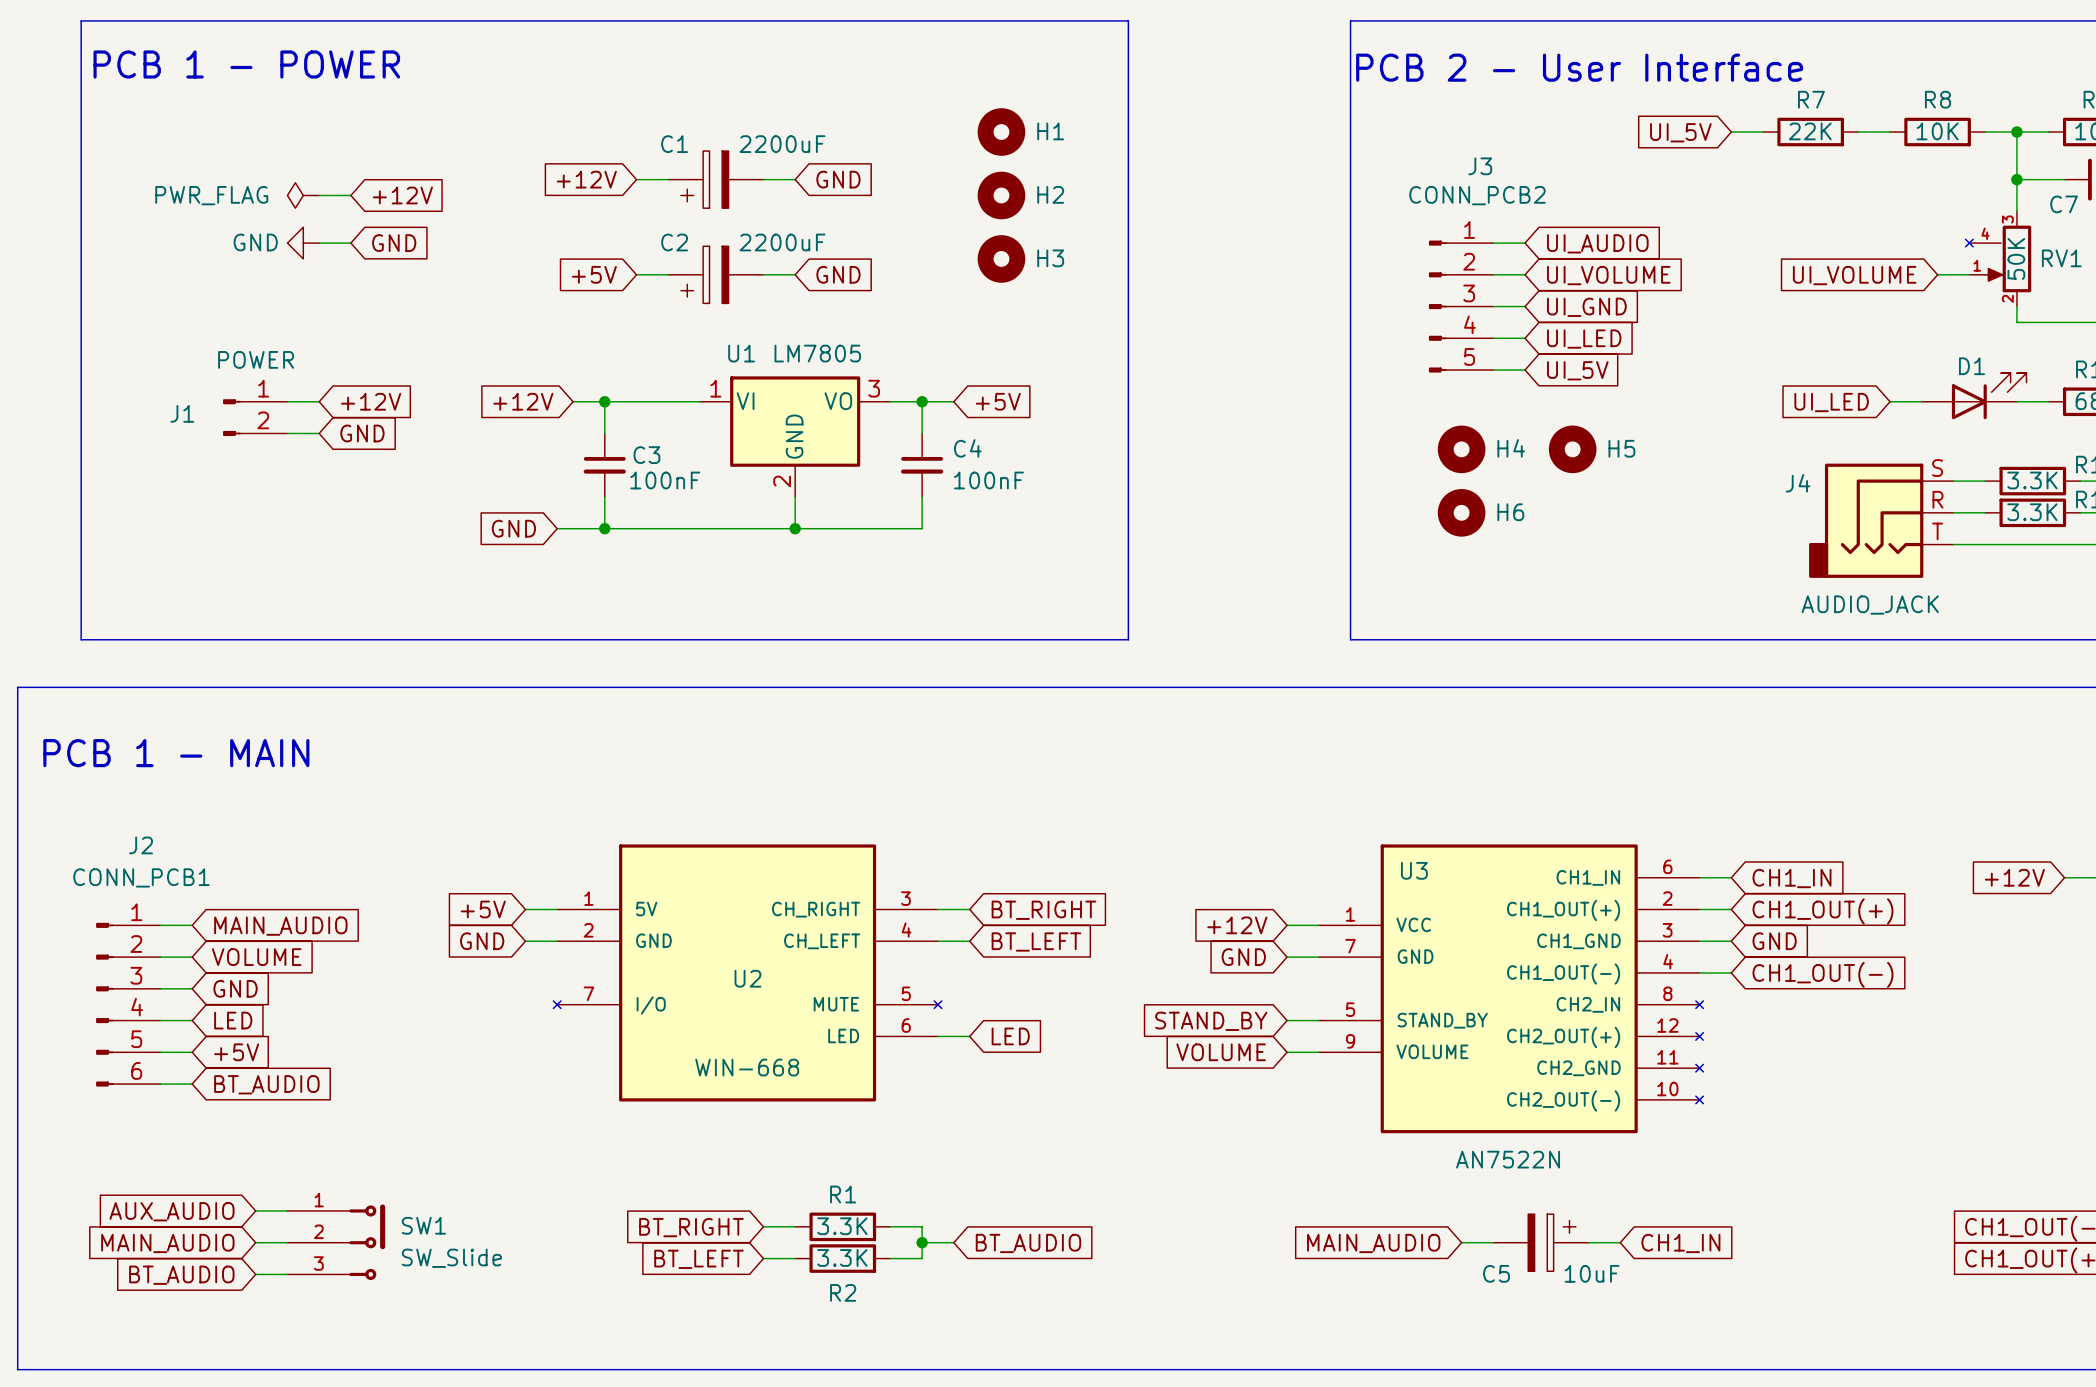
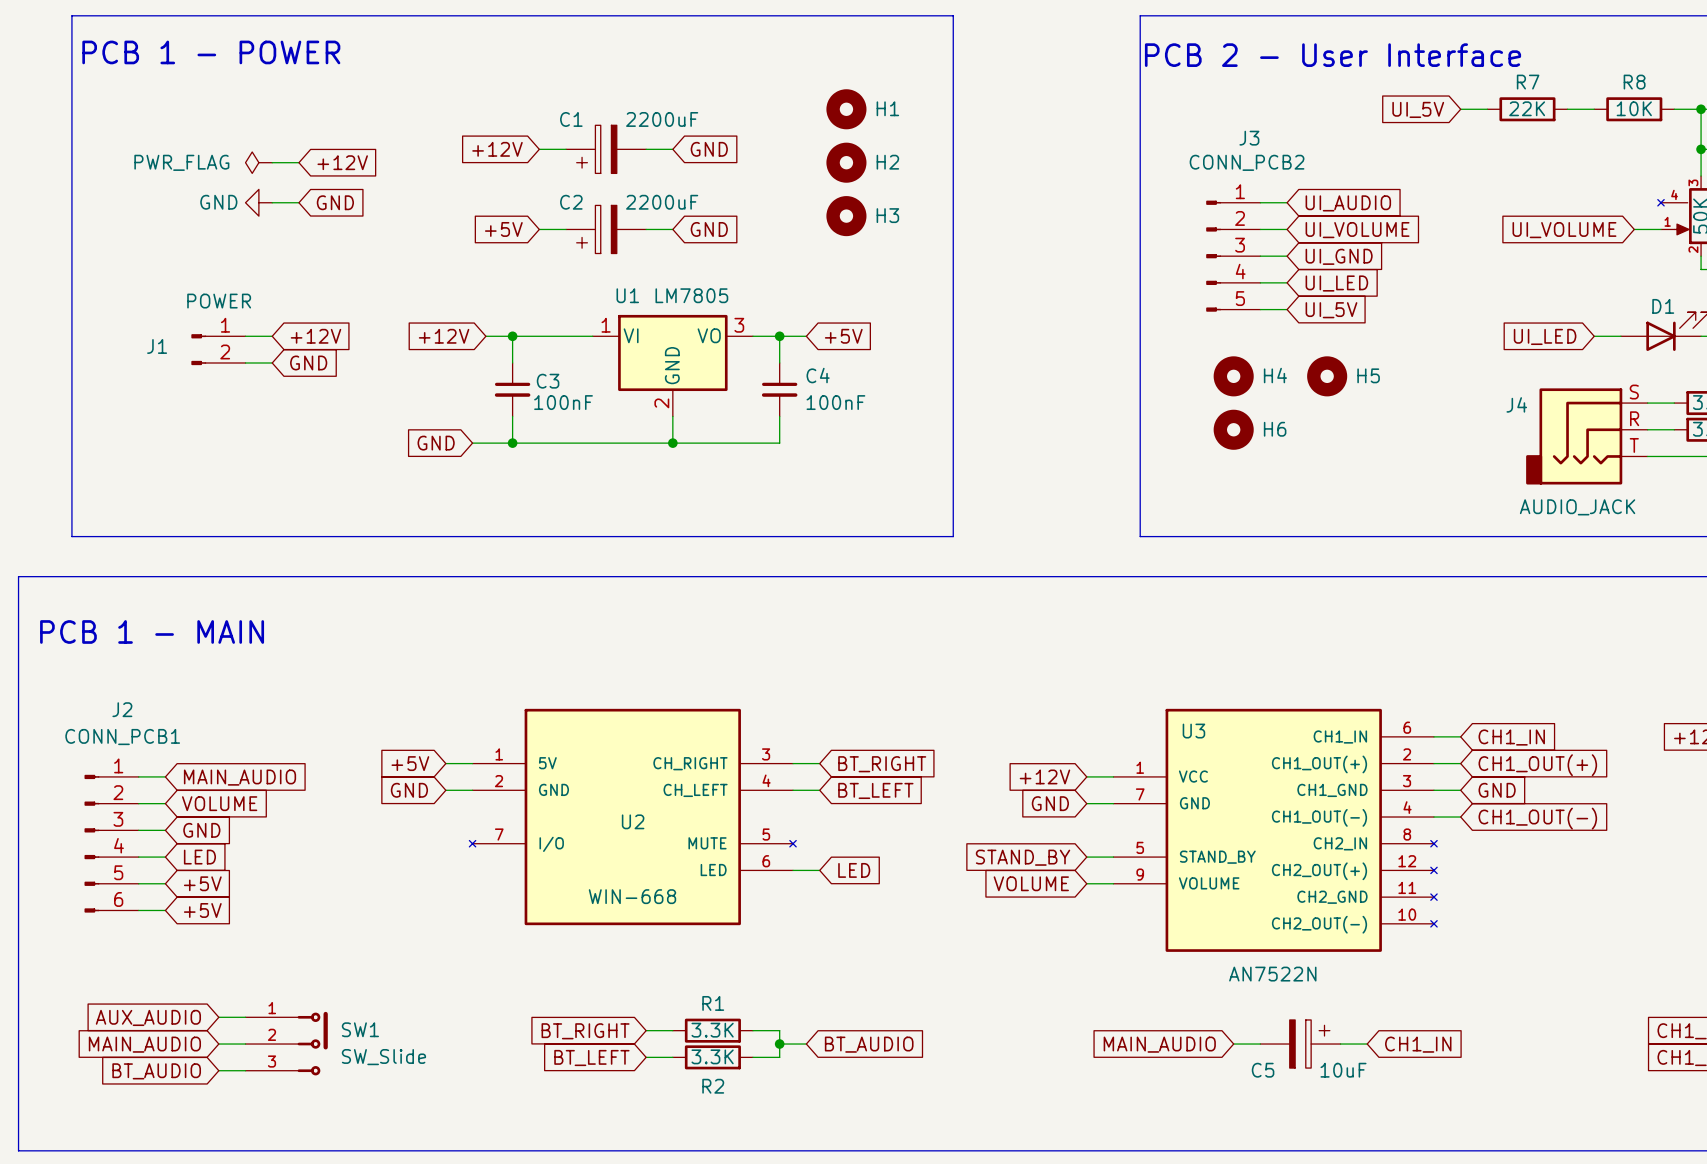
global label: BT_AUDIO (266, 1084) -> +5V (202, 910)

